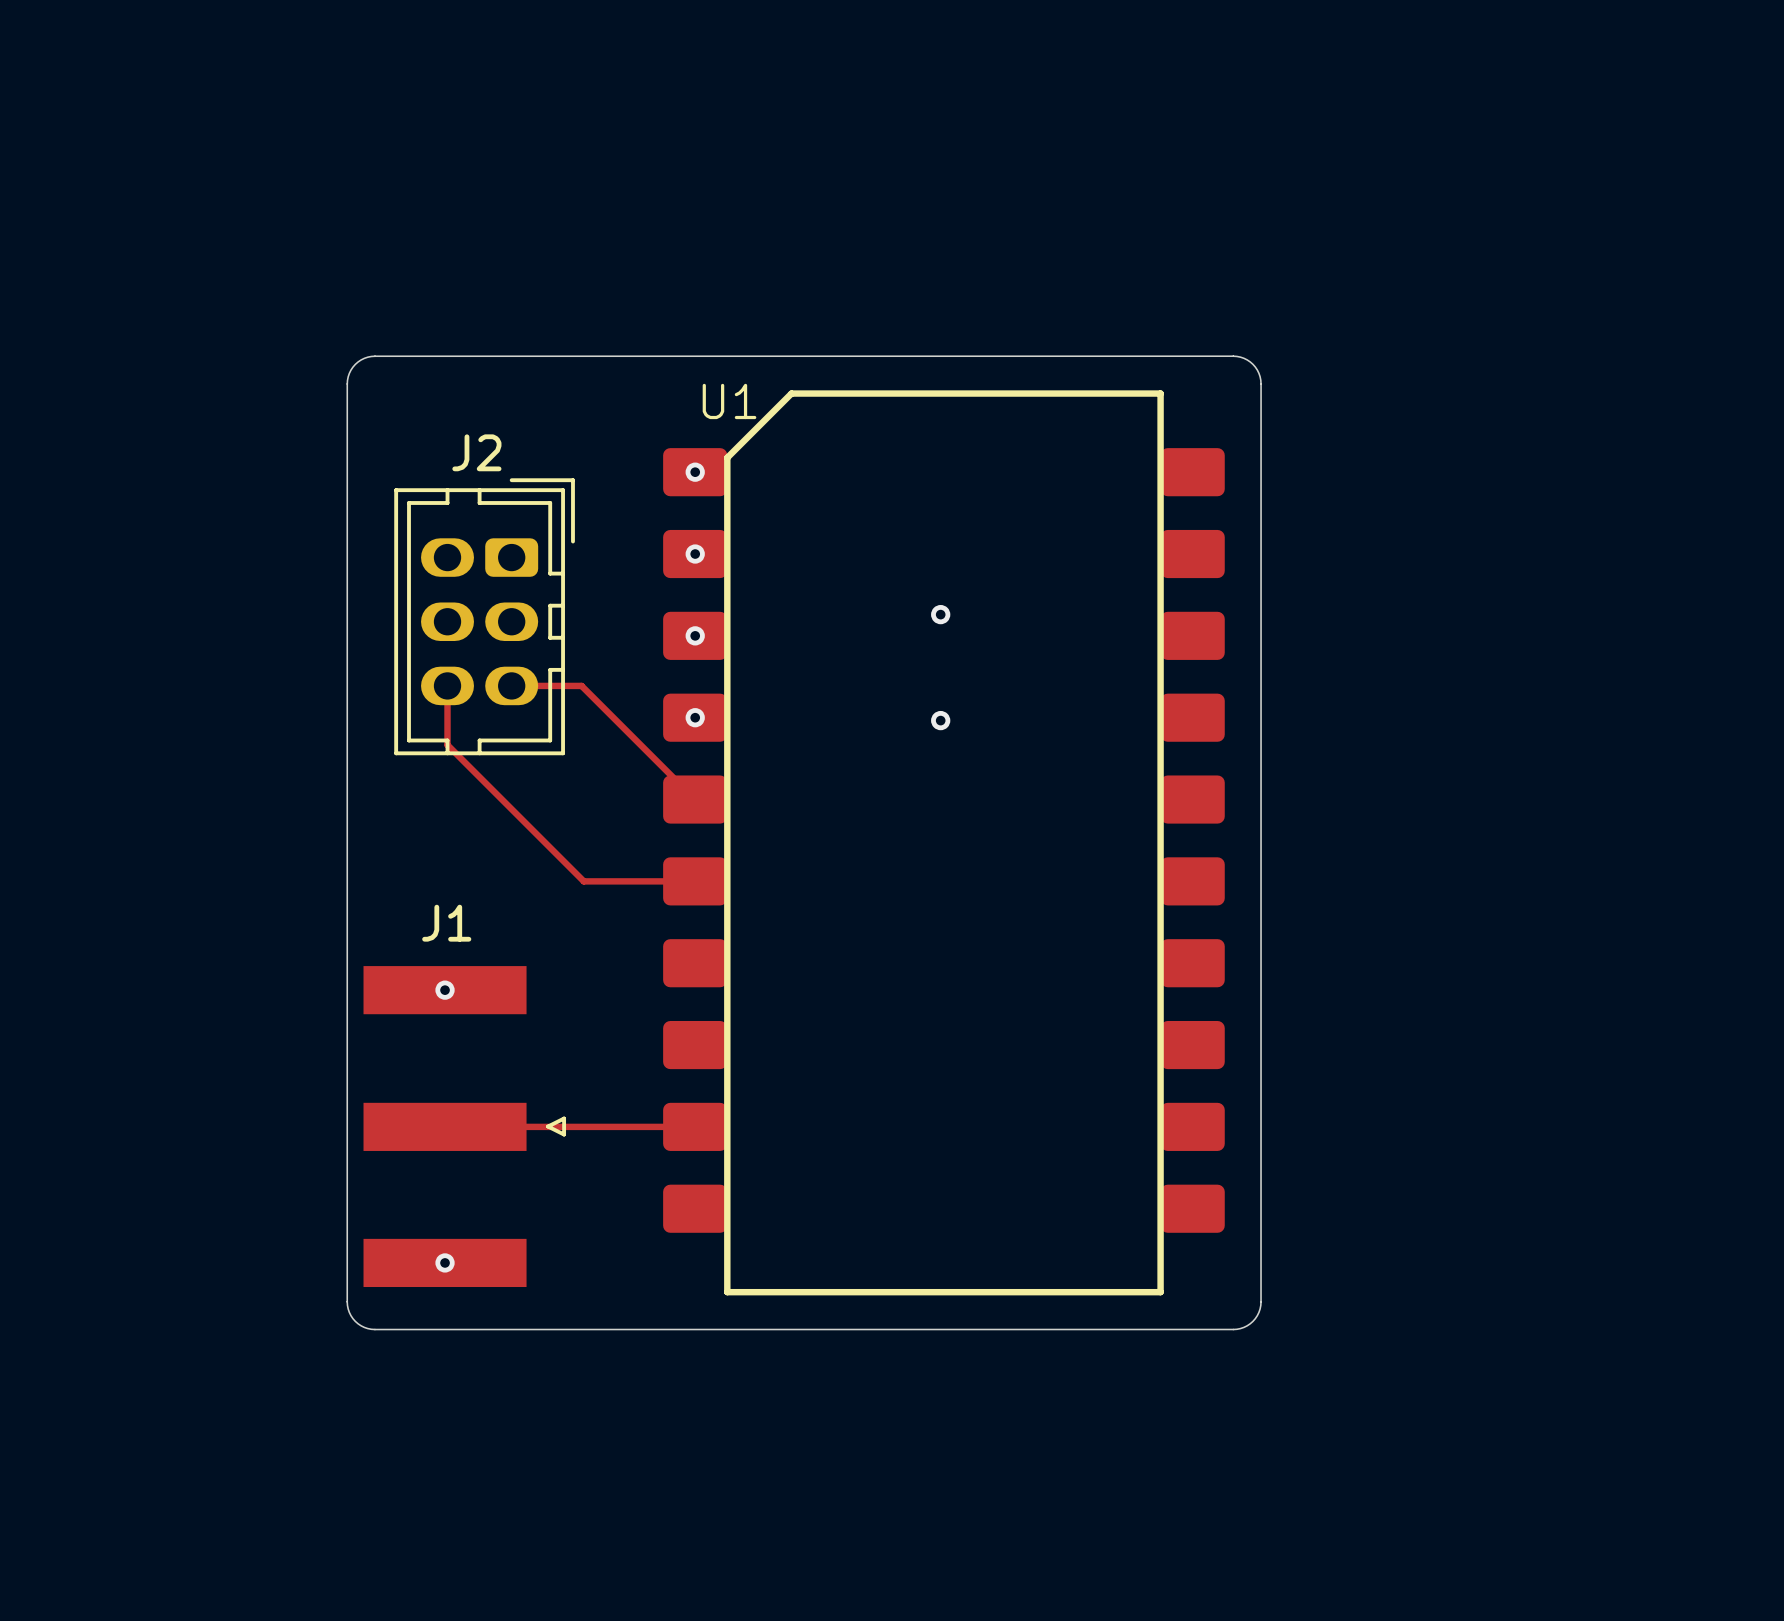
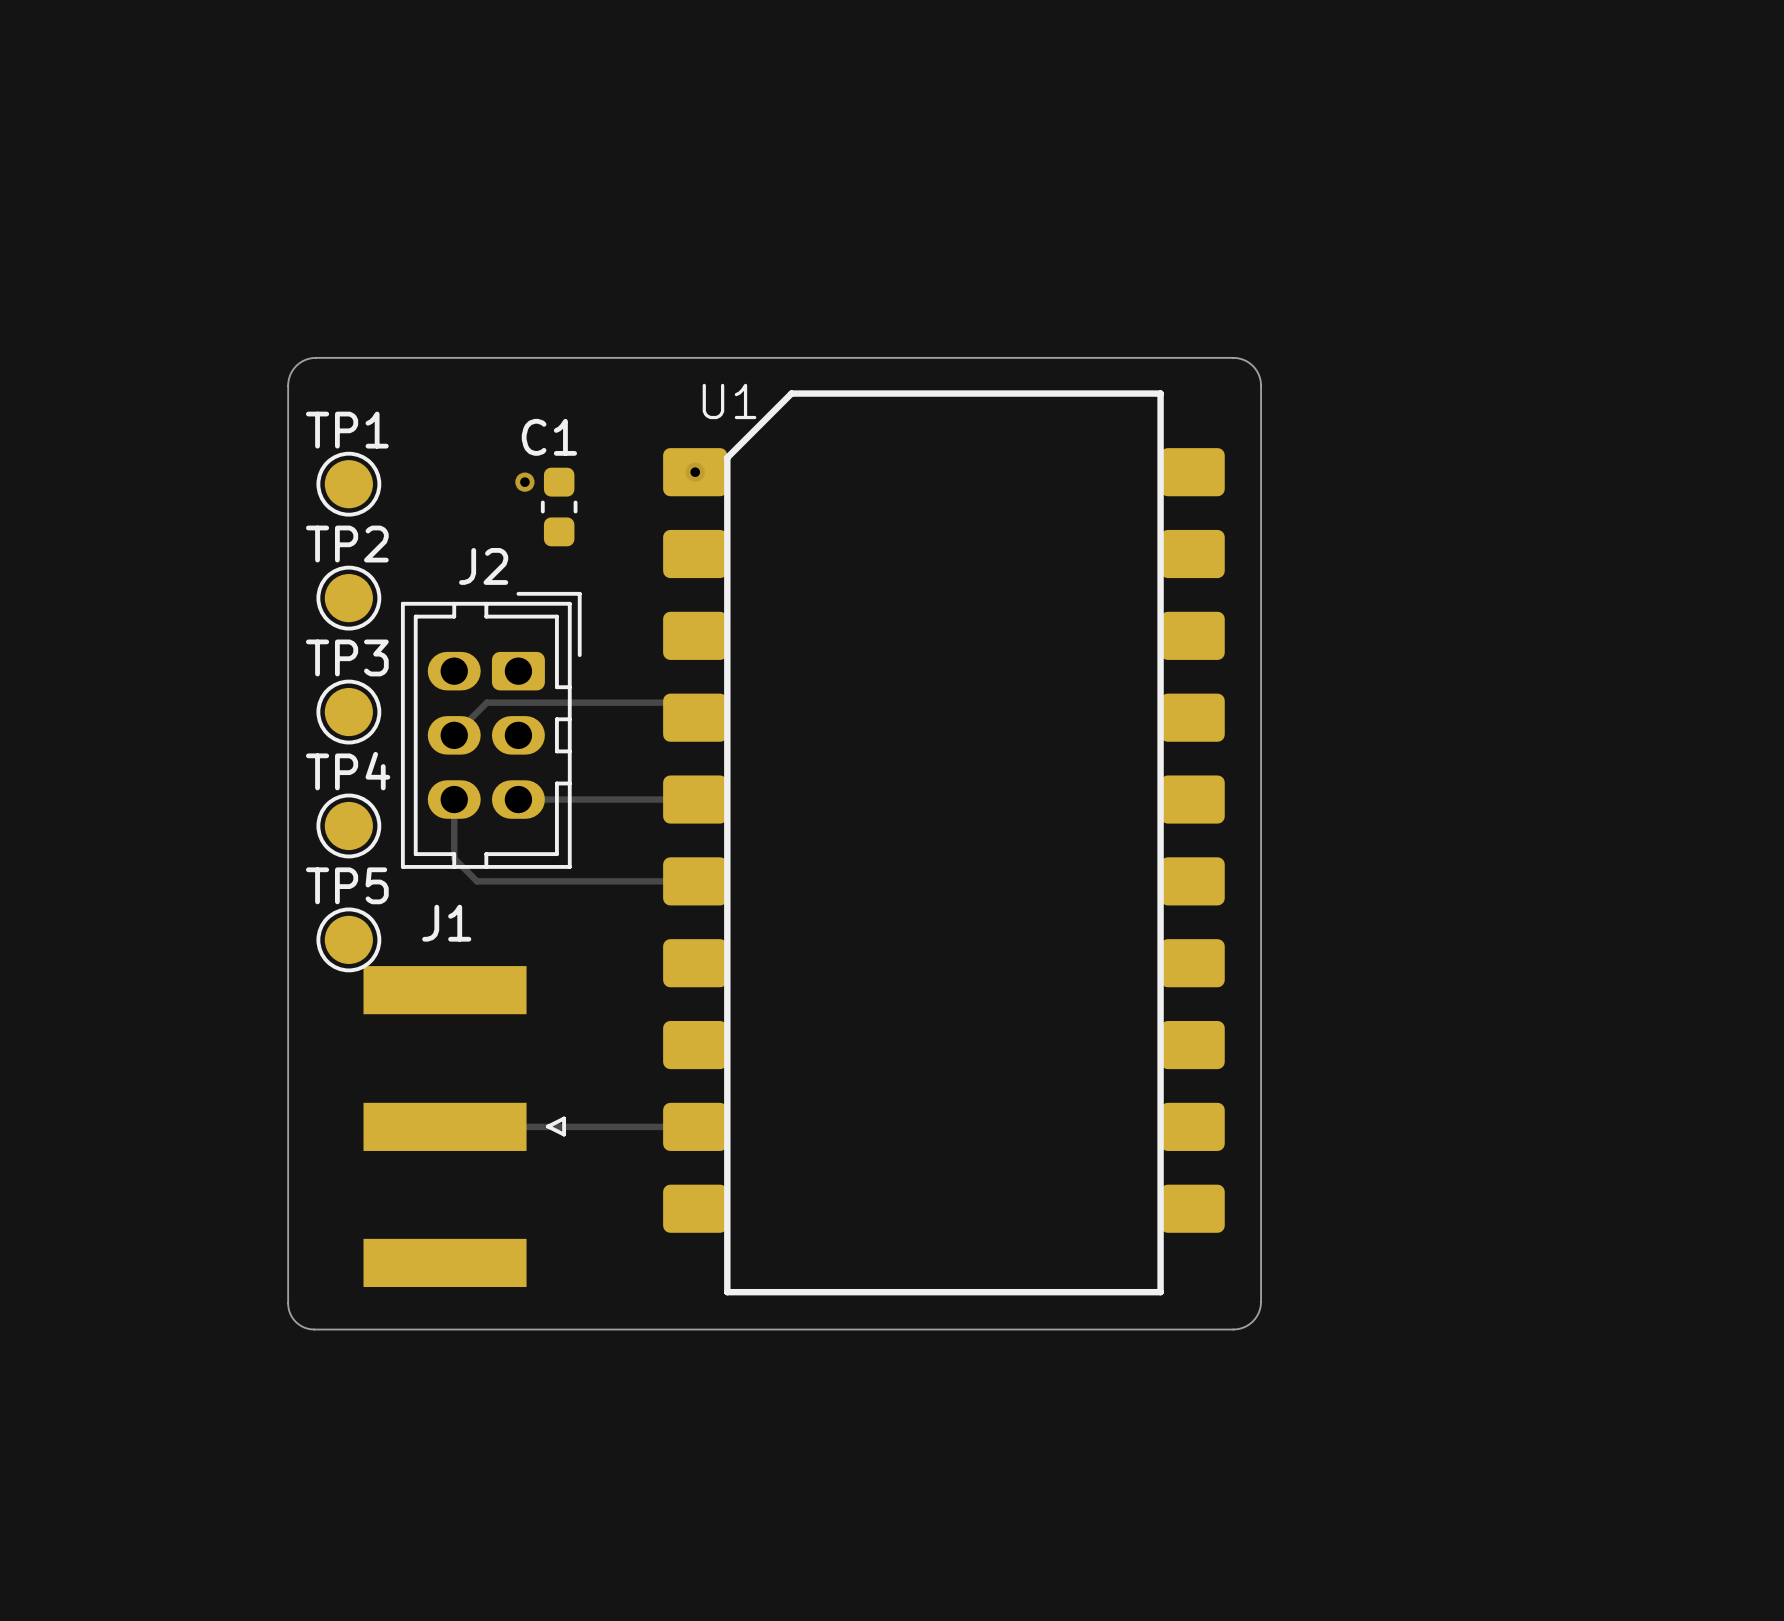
board edge: (1261, 385) (1258, 373) (1252, 364) (1243, 358) (1233, 356) (374, 356) (364, 358) (355, 364) (349, 373) (347, 383) (347, 1301) (349, 1312) (355, 1321) (364, 1327) (374, 1329) -> (1261, 385) (1258, 374) (1252, 365) (1243, 359) (1233, 357) (315, 357) (305, 359) (296, 365) (290, 374) (288, 385) (288, 1306) (295, 1321) (307, 1328) (374, 1329)
via: none -> (524, 482)
TP1: none -> (348, 484)
C1: none -> (559, 507)
via: (695, 554) -> none
TP2: none -> (348, 598)
via: (940, 614) -> none
J2 position: (484, 616) -> (491, 730)
via: (695, 635) -> none
track: (447, 685) (447, 745) (583, 881) -> (454, 799) (454, 858) (477, 881) (583, 881)
track: (511, 685) (581, 685) (695, 799) -> (518, 799) (695, 799)
TP3: none -> (348, 712)
track: none -> (695, 717) (680, 702) (486, 702) (454, 735)
via: (695, 717) -> none
via: (940, 720) -> none
TP4: none -> (348, 825)
TP5: none -> (348, 939)
via: (445, 990) -> none
via: (445, 1262) -> none

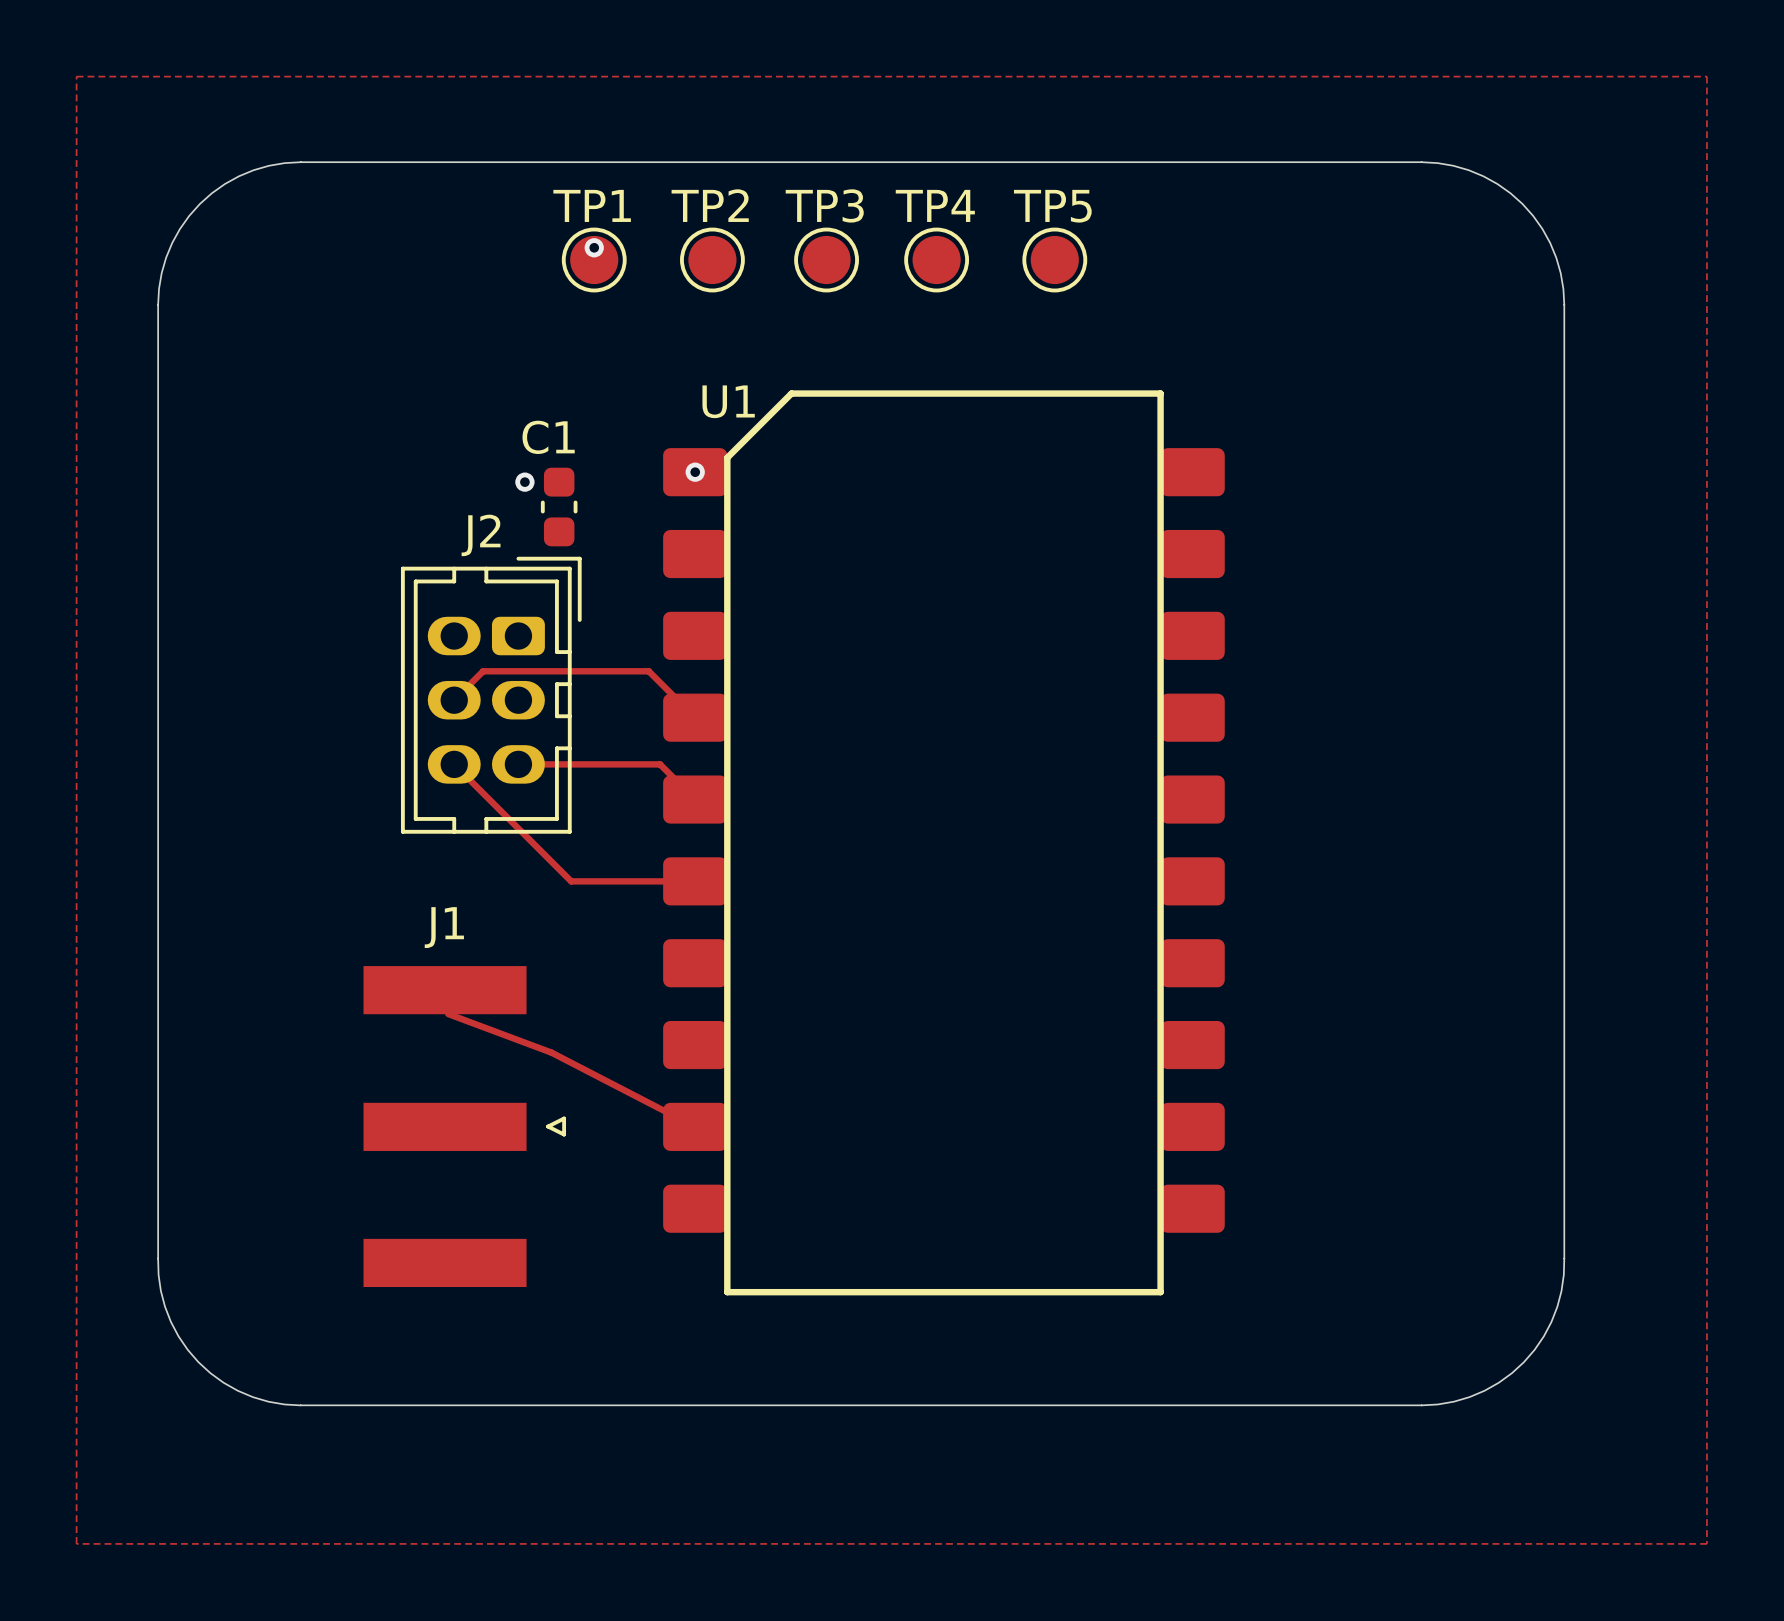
zone outline: none -> (76, 76) (1706, 76) (1706, 1543) (76, 1543) (76, 76)
via: none -> (594, 247)
board edge: (315, 357) (1233, 357) (1243, 359) (1252, 365) (1258, 374) (1261, 385) (1261, 1301) (1258, 1312) (1252, 1321) (1243, 1327) (1233, 1329) (314, 1329) (304, 1327) (295, 1321) (290, 1313) (288, 1303) (288, 385) (290, 374) (296, 365) (305, 359) (315, 357) -> (300, 162) (269, 165) (238, 176) (211, 193) (199, 203) (189, 215) (172, 242) (161, 273) (159, 288) (158, 1274) (165, 1306) (170, 1321) (187, 1349) (198, 1362) (223, 1382) (252, 1397) (284, 1404) (300, 1405) (1421, 1405) (1453, 1401) (1484, 1390) (1498, 1382) (1523, 1362) (1543, 1336) (1551, 1321) (1557, 1306) (1563, 1274) (1564, 304) (1560, 273) (1550, 242) (1542, 228) (1522, 203) (1497, 184) (1468, 170) (1437, 163) (1421, 162) (300, 162)
TP1 position: (348, 484) -> (594, 260)
TP2 position: (348, 598) -> (712, 260)
track: (680, 702) (486, 702) (454, 735) -> (680, 702) (648, 671) (483, 671) (454, 700)
TP3 position: (348, 712) -> (826, 260)
J2 position: (491, 730) -> (491, 695)
track: (454, 799) (454, 858) (477, 881) (571, 881) -> (454, 764) (571, 881)
track: (518, 799) (695, 799) -> (518, 764) (660, 764) (695, 799)
TP4 position: (348, 825) -> (936, 260)
TP5 position: (348, 939) -> (1054, 260)
track: (445, 1126) (695, 1126) -> (448, 1014) (551, 1052) (695, 1126)

